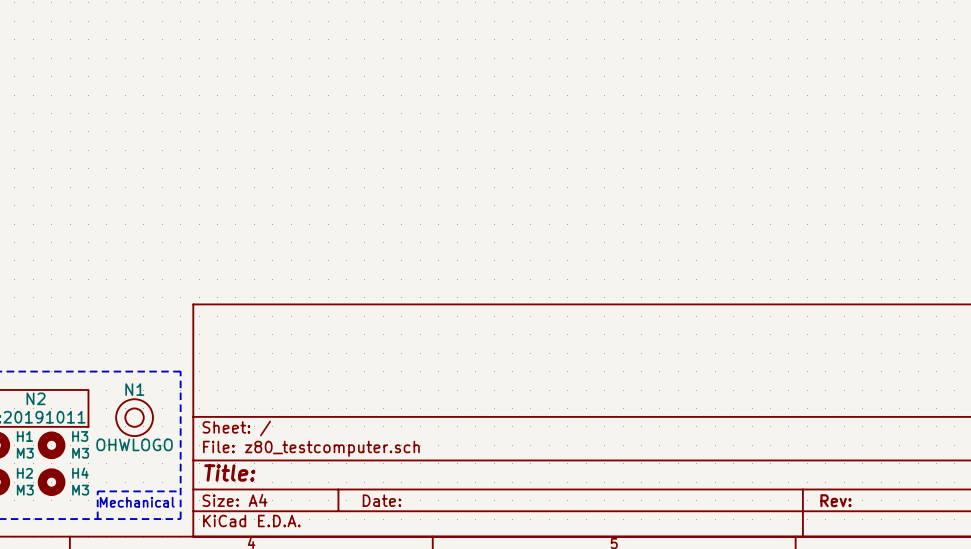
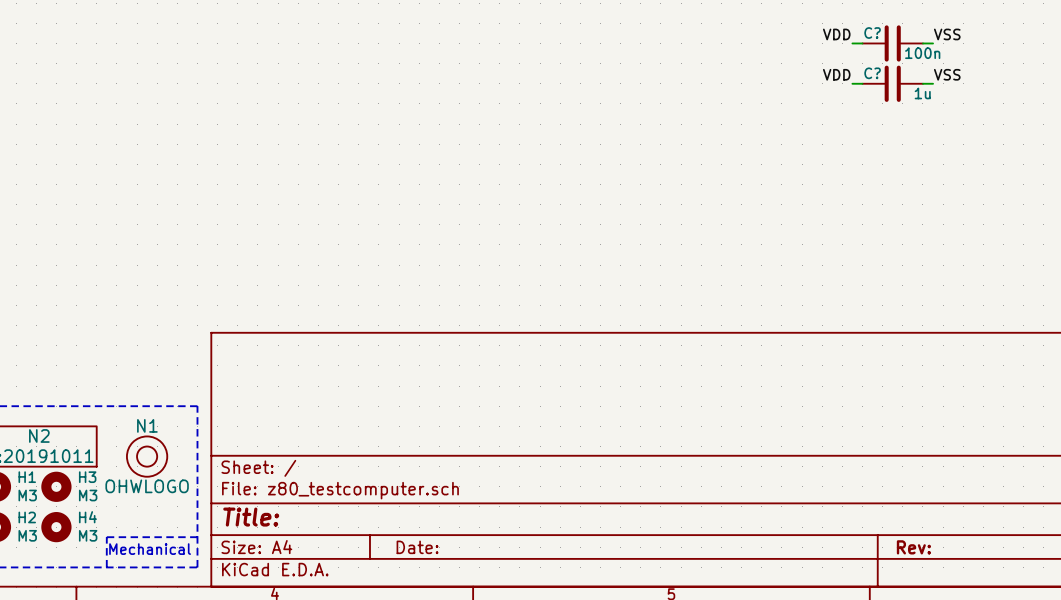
label: none -> VDD (836, 34)
label: none -> VSS (947, 34)
wire: none -> (852, 43) (862, 43)
C?: none -> 100n (892, 43)
wire: none -> (922, 43) (933, 43)
label: none -> VDD (836, 74)
label: none -> VSS (947, 74)
wire: none -> (852, 83) (862, 83)
C?: none -> 1u (892, 83)
wire: none -> (922, 83) (933, 83)

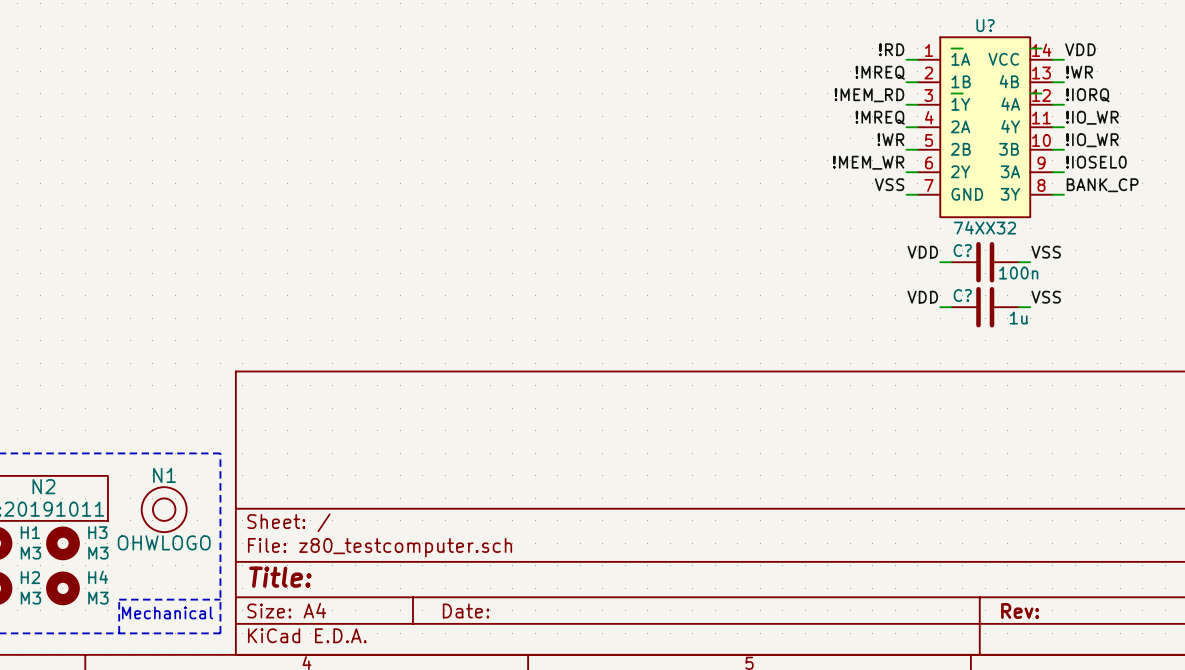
label: VDD (836, 34) -> none
label: VSS (947, 34) -> none
C?: 100n (892, 43) -> none
label: none -> !RD (891, 49)
label: none -> VDD (1080, 49)
wire: none -> (906, 59) (917, 59)
wire: none -> (1052, 59) (1063, 59)
label: none -> !WR (1079, 72)
label: none -> !MREQ (880, 72)
wire: none -> (906, 82) (917, 82)
wire: none -> (1052, 82) (1063, 82)
label: VDD (836, 74) -> none
label: VSS (947, 74) -> none
C? position: (892, 83) -> (985, 307)
label: none -> !MEM_RD (869, 95)
label: none -> !IORQ (1087, 95)
wire: none -> (906, 104) (917, 104)
wire: none -> (1052, 104) (1063, 104)
label: none -> !MREQ (880, 117)
label: none -> !IO_WR (1092, 117)
wire: none -> (906, 127) (917, 127)
U?: none -> 74XX32 (985, 127)
wire: none -> (1052, 127) (1063, 127)
label: none -> !WR (890, 139)
label: none -> !IO_WR (1092, 140)
wire: none -> (906, 149) (917, 149)
wire: none -> (1052, 149) (1063, 149)
label: none -> !MEM_WR (868, 162)
label: none -> !IOSEL0 (1096, 162)
wire: none -> (906, 172) (917, 172)
wire: none -> (1052, 172) (1063, 172)
label: none -> VSS (889, 184)
label: none -> BANK_CP (1102, 185)
wire: none -> (906, 194) (917, 194)
wire: none -> (1052, 194) (1063, 194)
label: none -> VDD (922, 252)
label: none -> VSS (1046, 252)
wire: none -> (940, 262) (951, 262)
C?: none -> 100n (985, 262)
wire: none -> (1018, 262) (1030, 262)
label: none -> VDD (922, 297)
label: none -> VSS (1046, 297)
wire: none -> (940, 307) (951, 307)
wire: none -> (1018, 307) (1030, 307)

